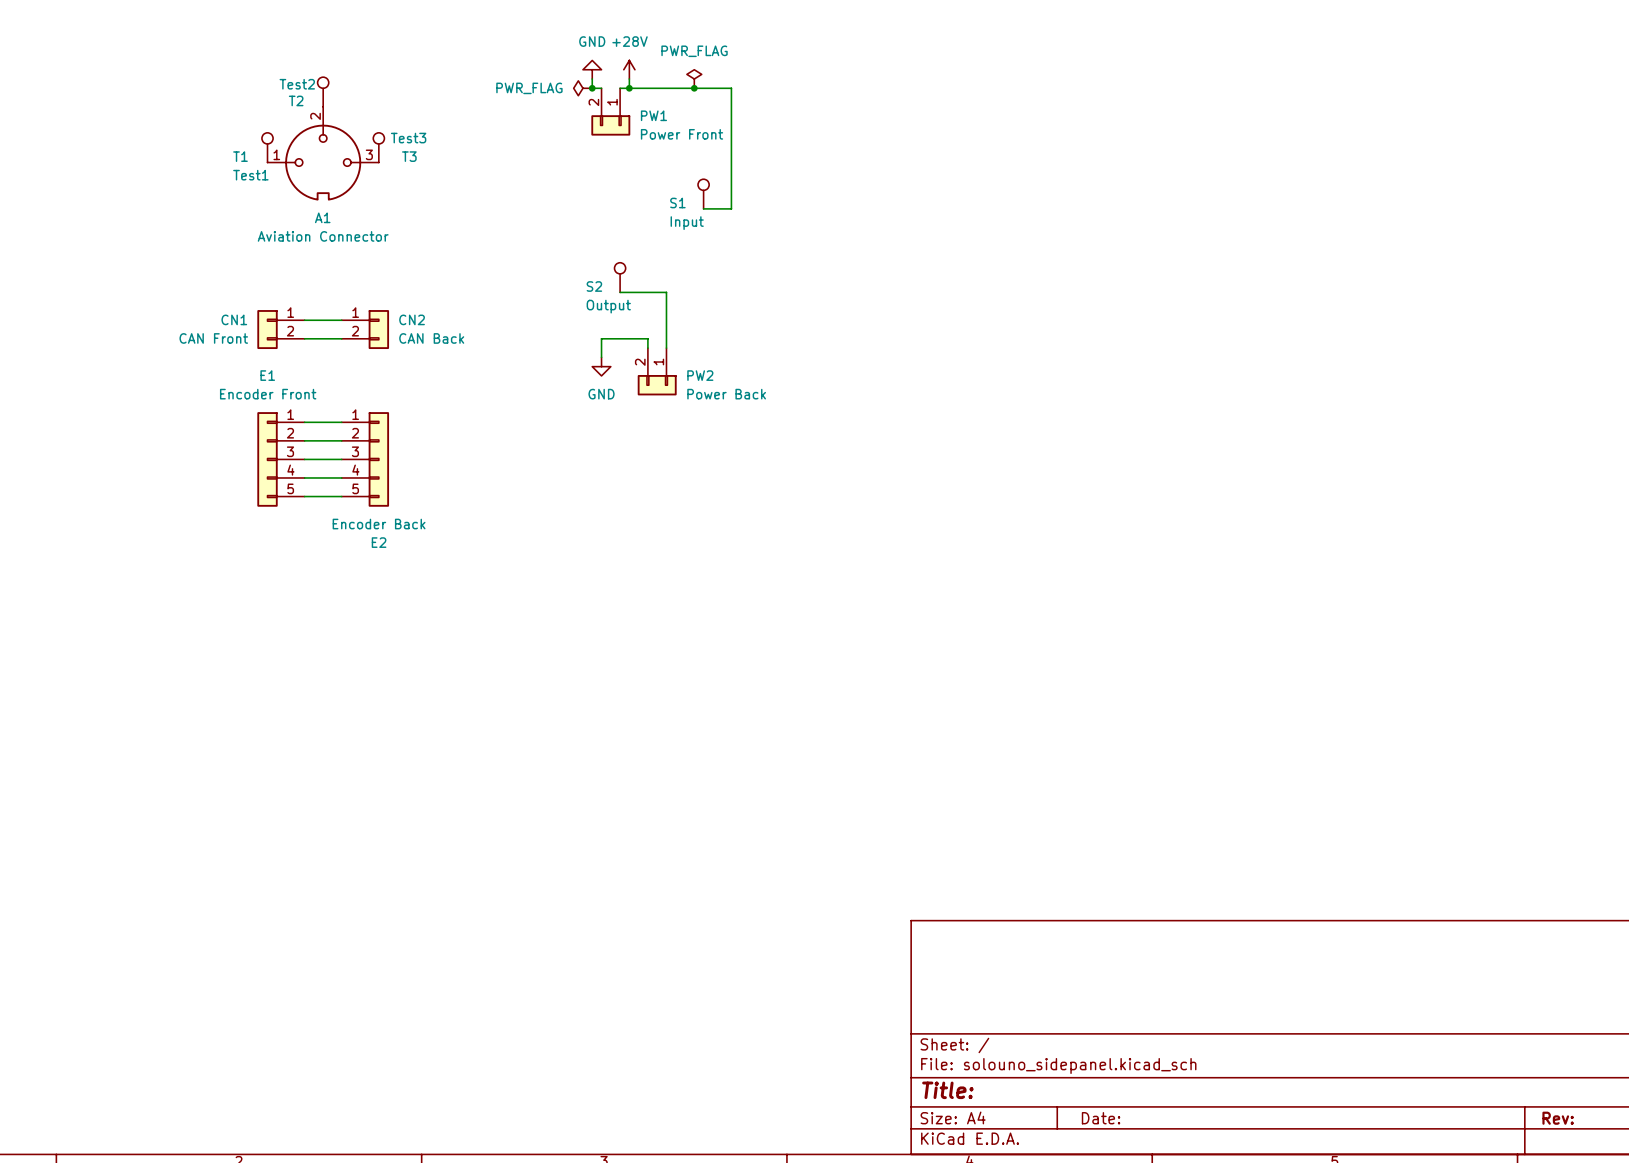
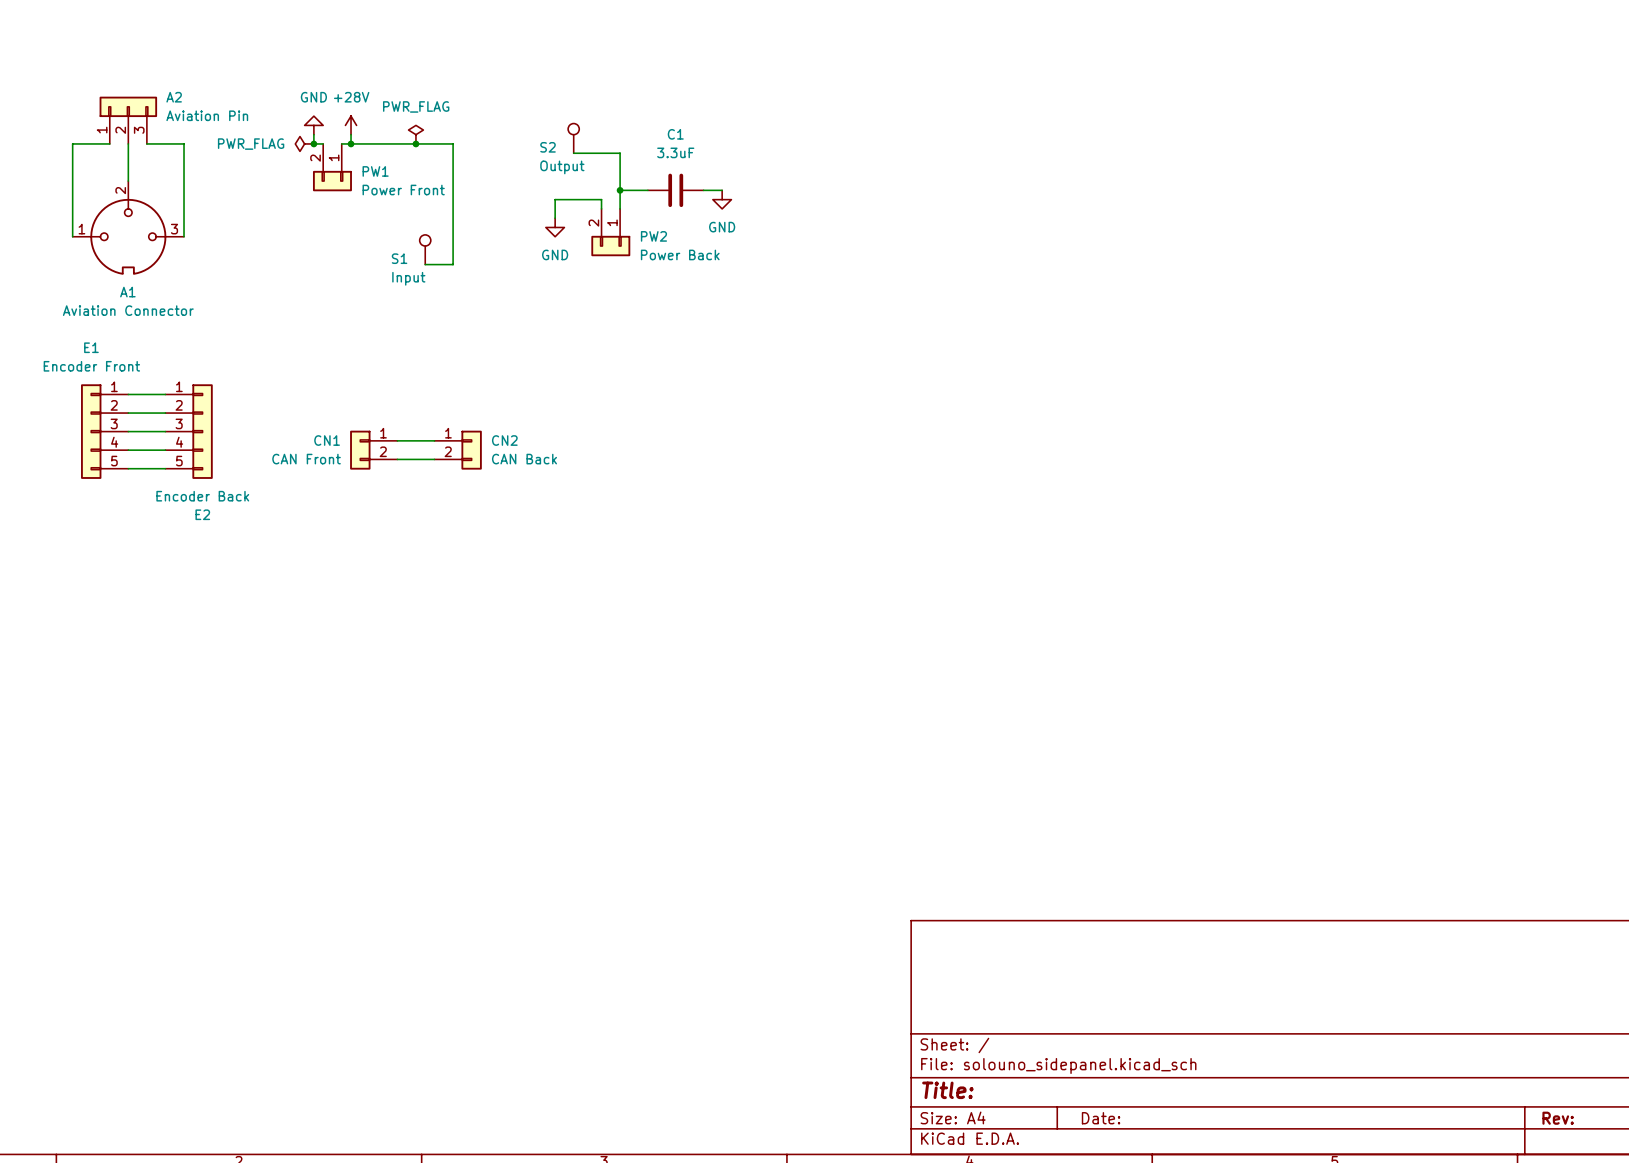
power symbol: GND (592, 69) -> none
power symbol: +28V (629, 69) -> none
wire: (592, 79) (592, 88) (601, 88) -> none
wire: (629, 79) (629, 88) -> none
power symbol: PWR_FLAG (694, 79) -> none
power symbol: PWR_FLAG (582, 88) -> none
junction: (592, 88) -> none
wire: (620, 88) (731, 88) (731, 208) (703, 208) -> none
junction: (629, 88) -> none
junction: (694, 88) -> none
T2: Test2 (323, 92) -> none
PW1 position: (610, 111) -> (332, 167)
A2: none -> Aviation Pin (128, 120)
power symbol: none -> GND (313, 125)
power symbol: none -> +28V (351, 125)
wire: none -> (313, 134) (313, 143) (323, 143)
wire: none -> (351, 134) (351, 143)
power symbol: none -> PWR_FLAG (415, 134)
wire: none -> (109, 143) (72, 143) (72, 236)
wire: none -> (128, 143) (128, 181)
wire: none -> (146, 143) (184, 143) (184, 236)
power symbol: none -> PWR_FLAG (304, 143)
junction: none -> (313, 143)
wire: none -> (341, 143) (453, 143) (453, 264) (425, 264)
junction: none -> (351, 143)
junction: none -> (415, 143)
T1: Test1 (267, 147) -> none
T3: Test3 (378, 147) -> none
A1 position: (323, 153) -> (128, 227)
wire: none -> (620, 190) (647, 190)
junction: none -> (620, 190)
C1: none -> 3.3uF (675, 190)
wire: none -> (703, 190) (722, 190)
S1 position: (703, 194) -> (425, 249)
power symbol: none -> GND (722, 199)
power symbol: none -> GND (555, 227)
S2 position: (620, 277) -> (573, 138)
wire: (620, 292) (666, 292) (666, 348) -> (573, 153) (620, 153) (620, 208)
wire: (304, 320) (341, 320) -> (397, 440) (434, 440)
CN1 position: (280, 329) -> (373, 450)
CN2 position: (365, 329) -> (458, 450)
wire: (304, 338) (341, 338) -> (397, 459) (434, 459)
wire: (647, 348) (647, 338) (601, 338) (601, 357) -> (601, 208) (601, 199) (555, 199) (555, 218)
power symbol: GND (601, 366) -> none
PW2 position: (657, 371) -> (610, 232)
wire: (304, 422) (341, 422) -> (128, 394) (165, 394)
wire: (304, 440) (341, 440) -> (128, 413) (165, 413)
E1 position: (280, 459) -> (104, 431)
wire: (304, 459) (341, 459) -> (128, 431) (165, 431)
E2 position: (365, 459) -> (189, 431)
wire: (304, 477) (341, 477) -> (128, 450) (165, 450)
wire: (304, 496) (341, 496) -> (128, 468) (165, 468)

